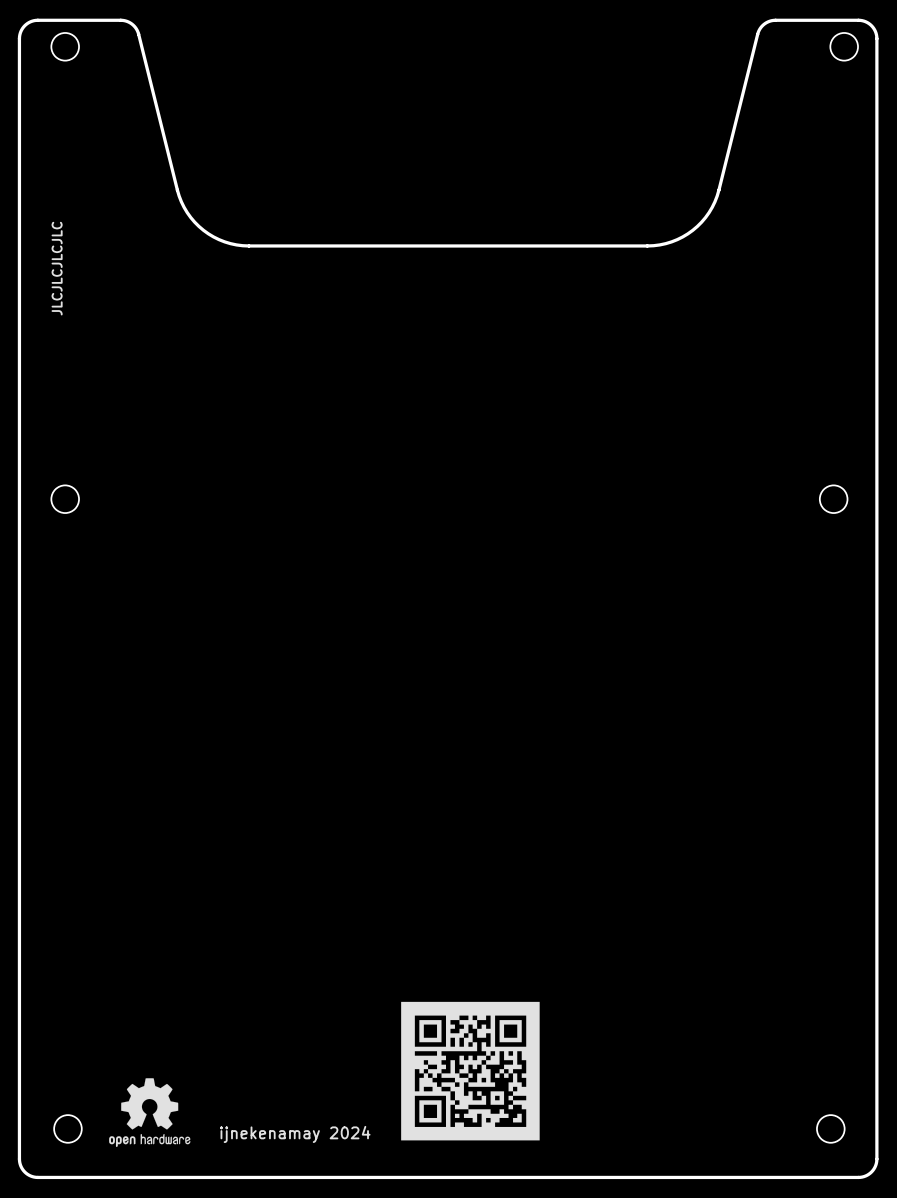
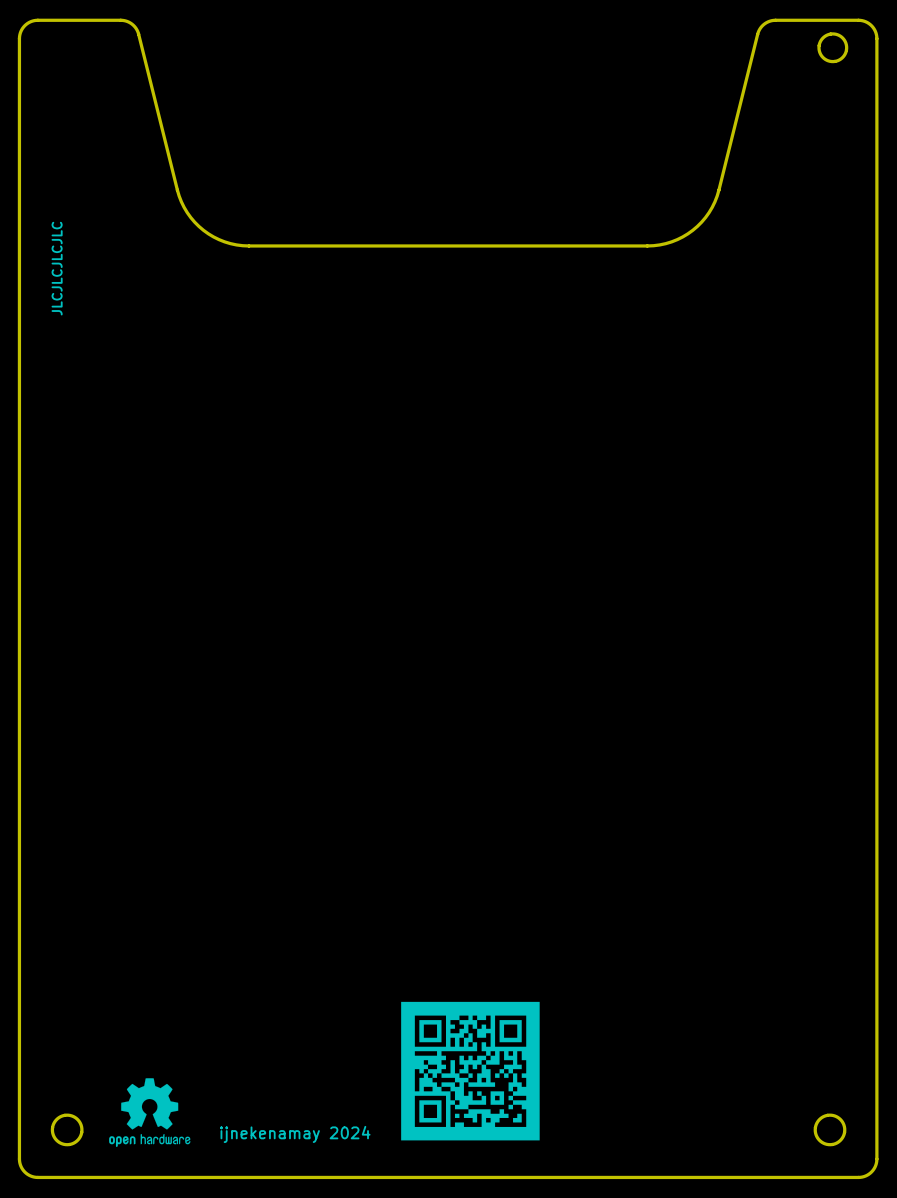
round board edge: [50, 32, 80, 62] -> none
round board edge: [829, 32, 859, 62] -> none
board edge: none -> (830, 34) (840, 36) (846, 44) (844, 55) (835, 61) (825, 59) (819, 50) (821, 39) (830, 34)
round board edge: [50, 484, 80, 514] -> none
round board edge: [819, 484, 848, 514] -> none
round board edge: [53, 1114, 83, 1144] -> none
round board edge: [816, 1114, 846, 1144] -> none
board edge: none -> (64, 1115) (74, 1117) (81, 1126) (79, 1138) (69, 1144) (59, 1142) (52, 1132) (55, 1121) (64, 1115)
board edge: none -> (827, 1115) (837, 1117) (844, 1126) (841, 1138) (832, 1144) (822, 1142) (815, 1132) (818, 1121) (827, 1115)

